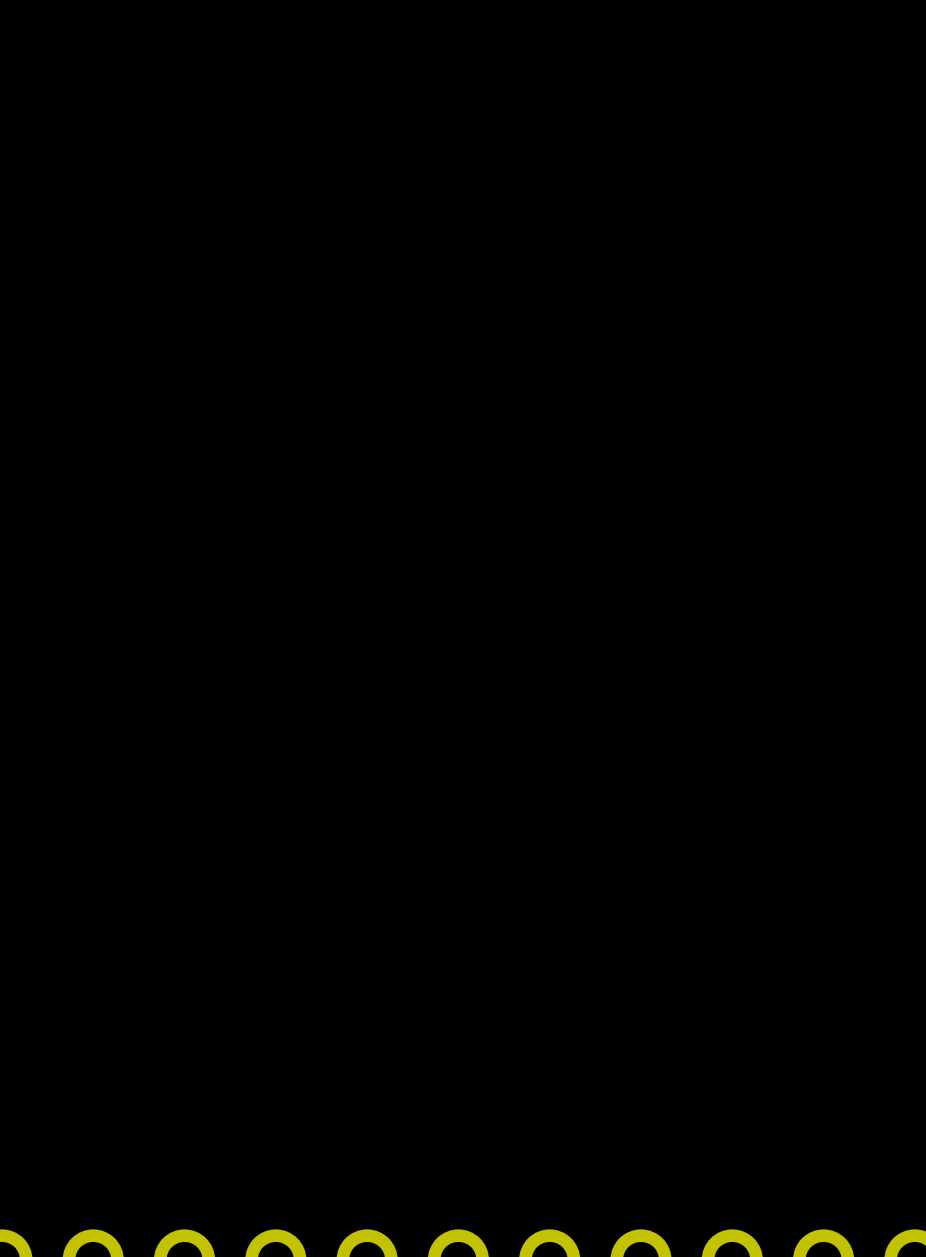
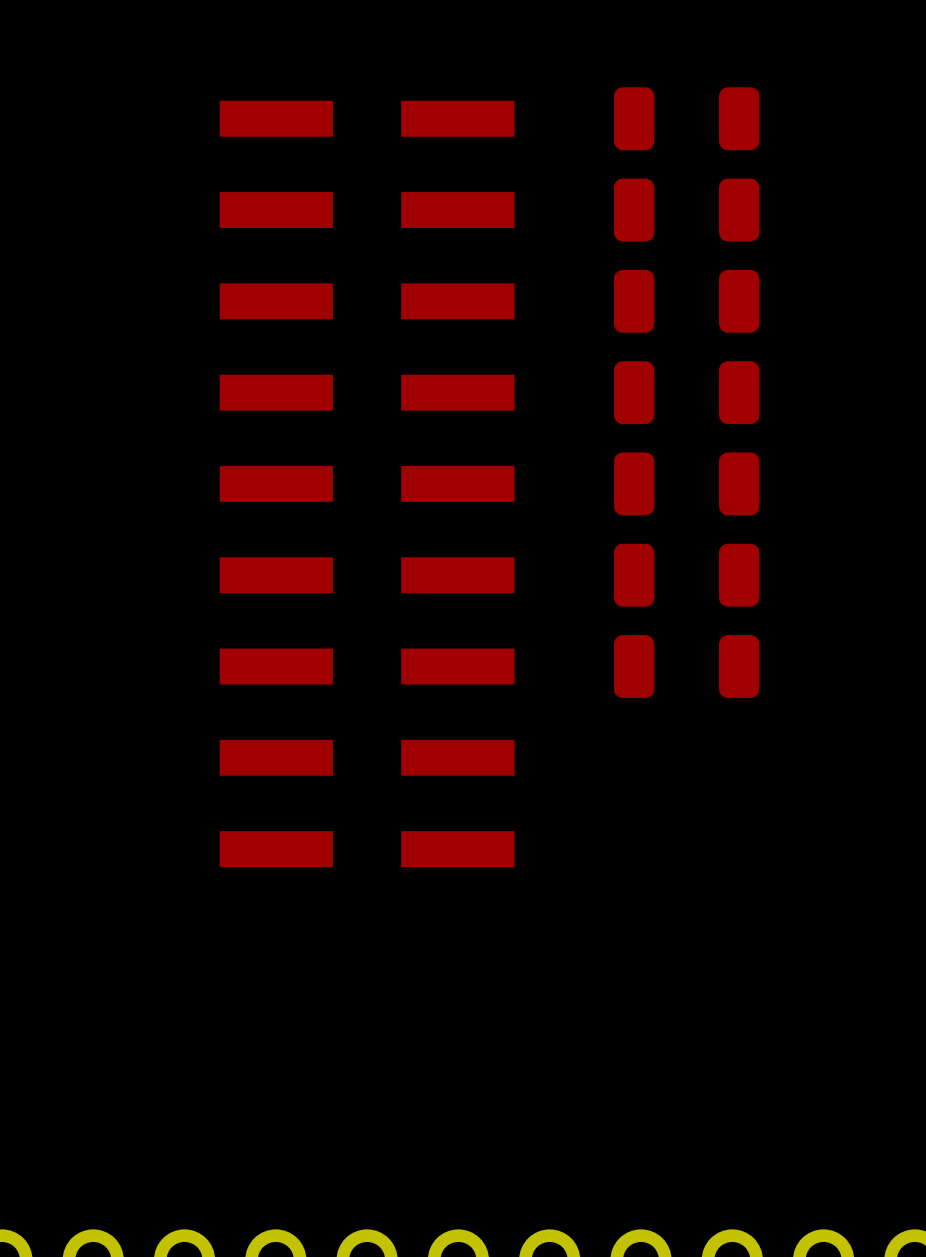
part: none -> (686, 118)
part: none -> (686, 210)
part: none -> (686, 301)
part: none -> (686, 392)
part: none -> (367, 483)
part: none -> (686, 483)
part: none -> (686, 575)
part: none -> (686, 666)

